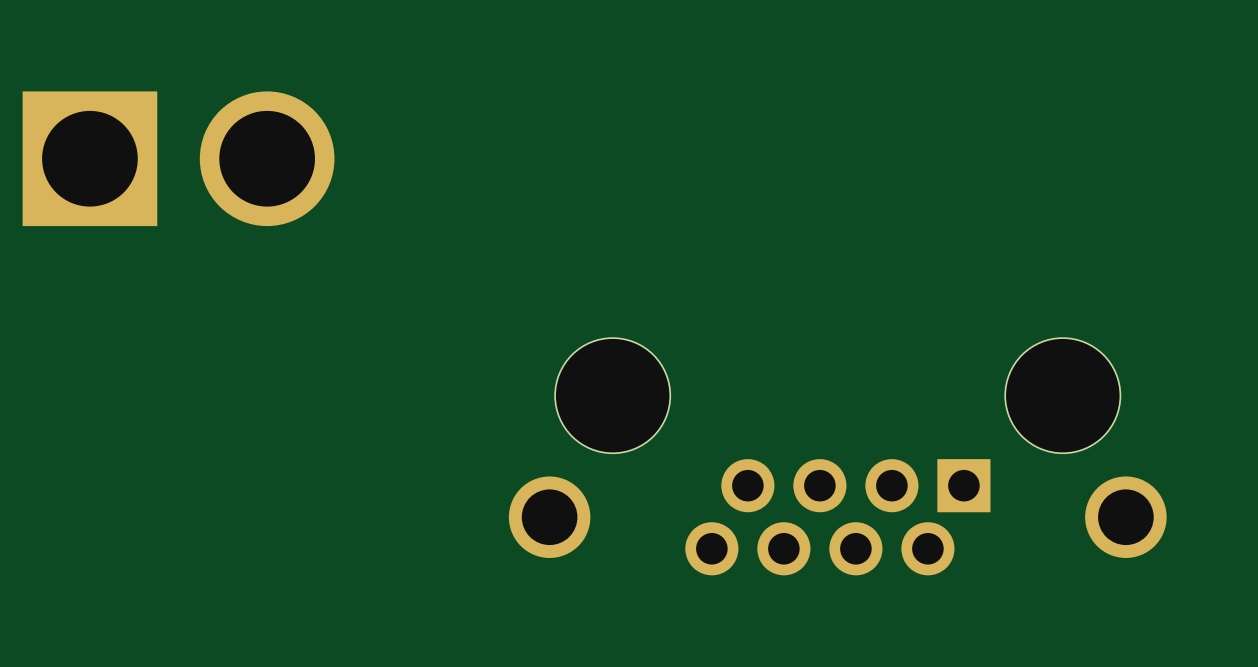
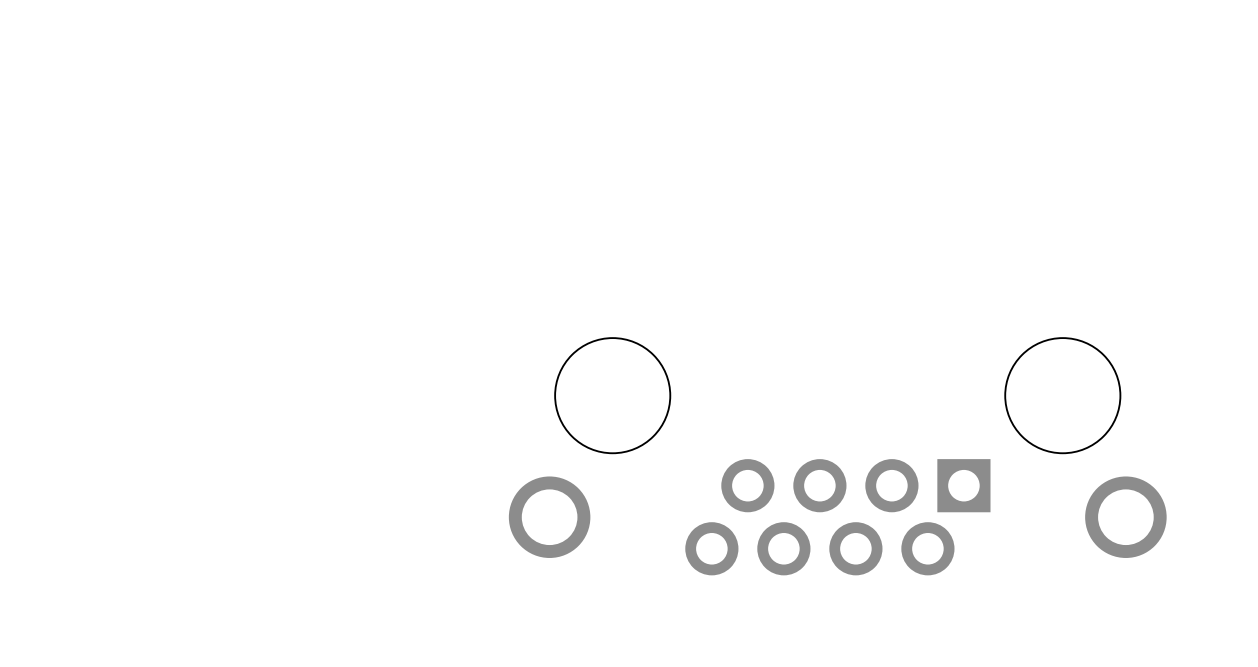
part: (178, 158) -> none

